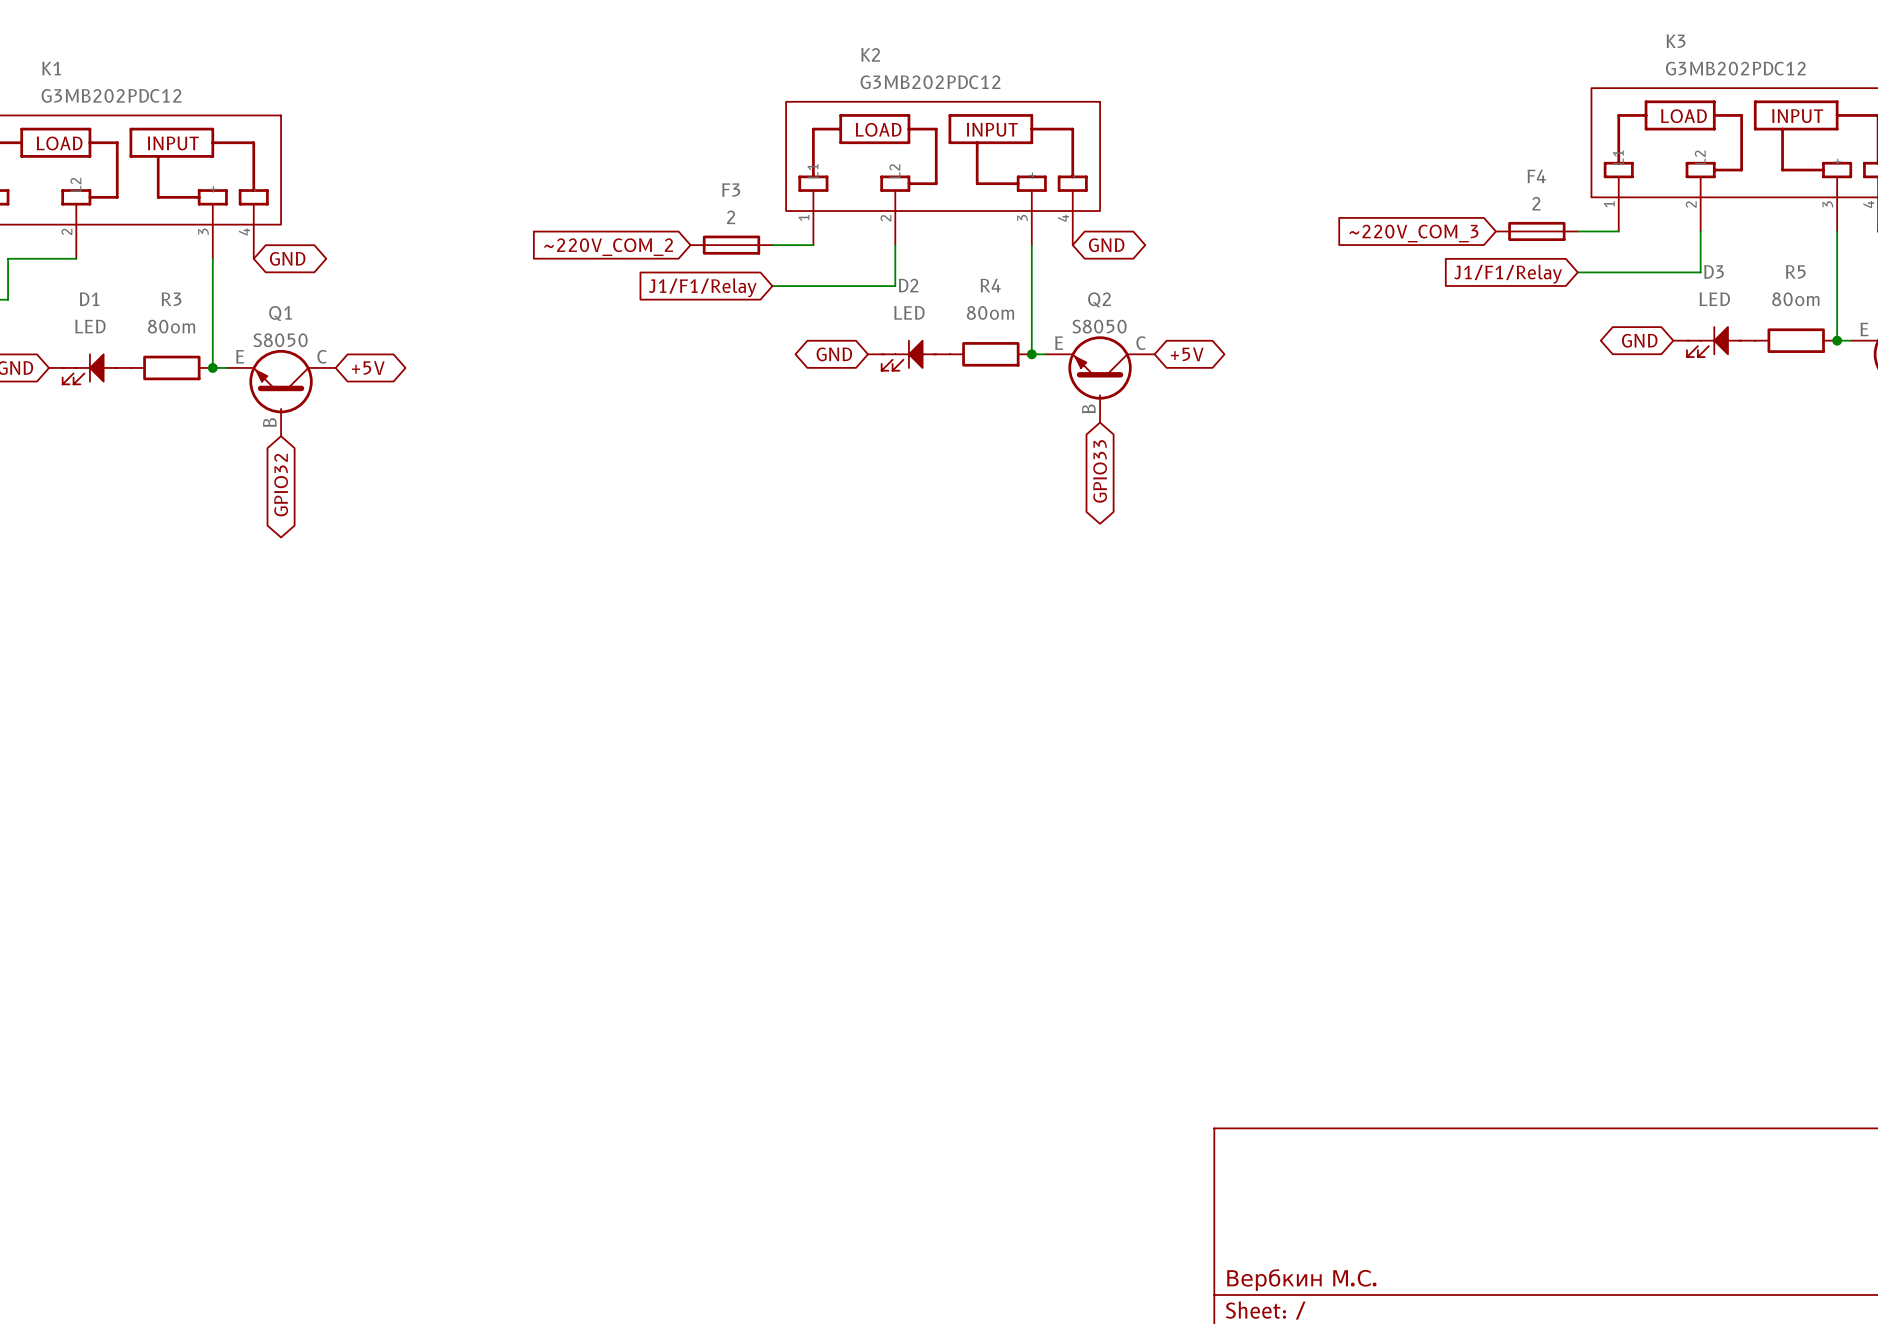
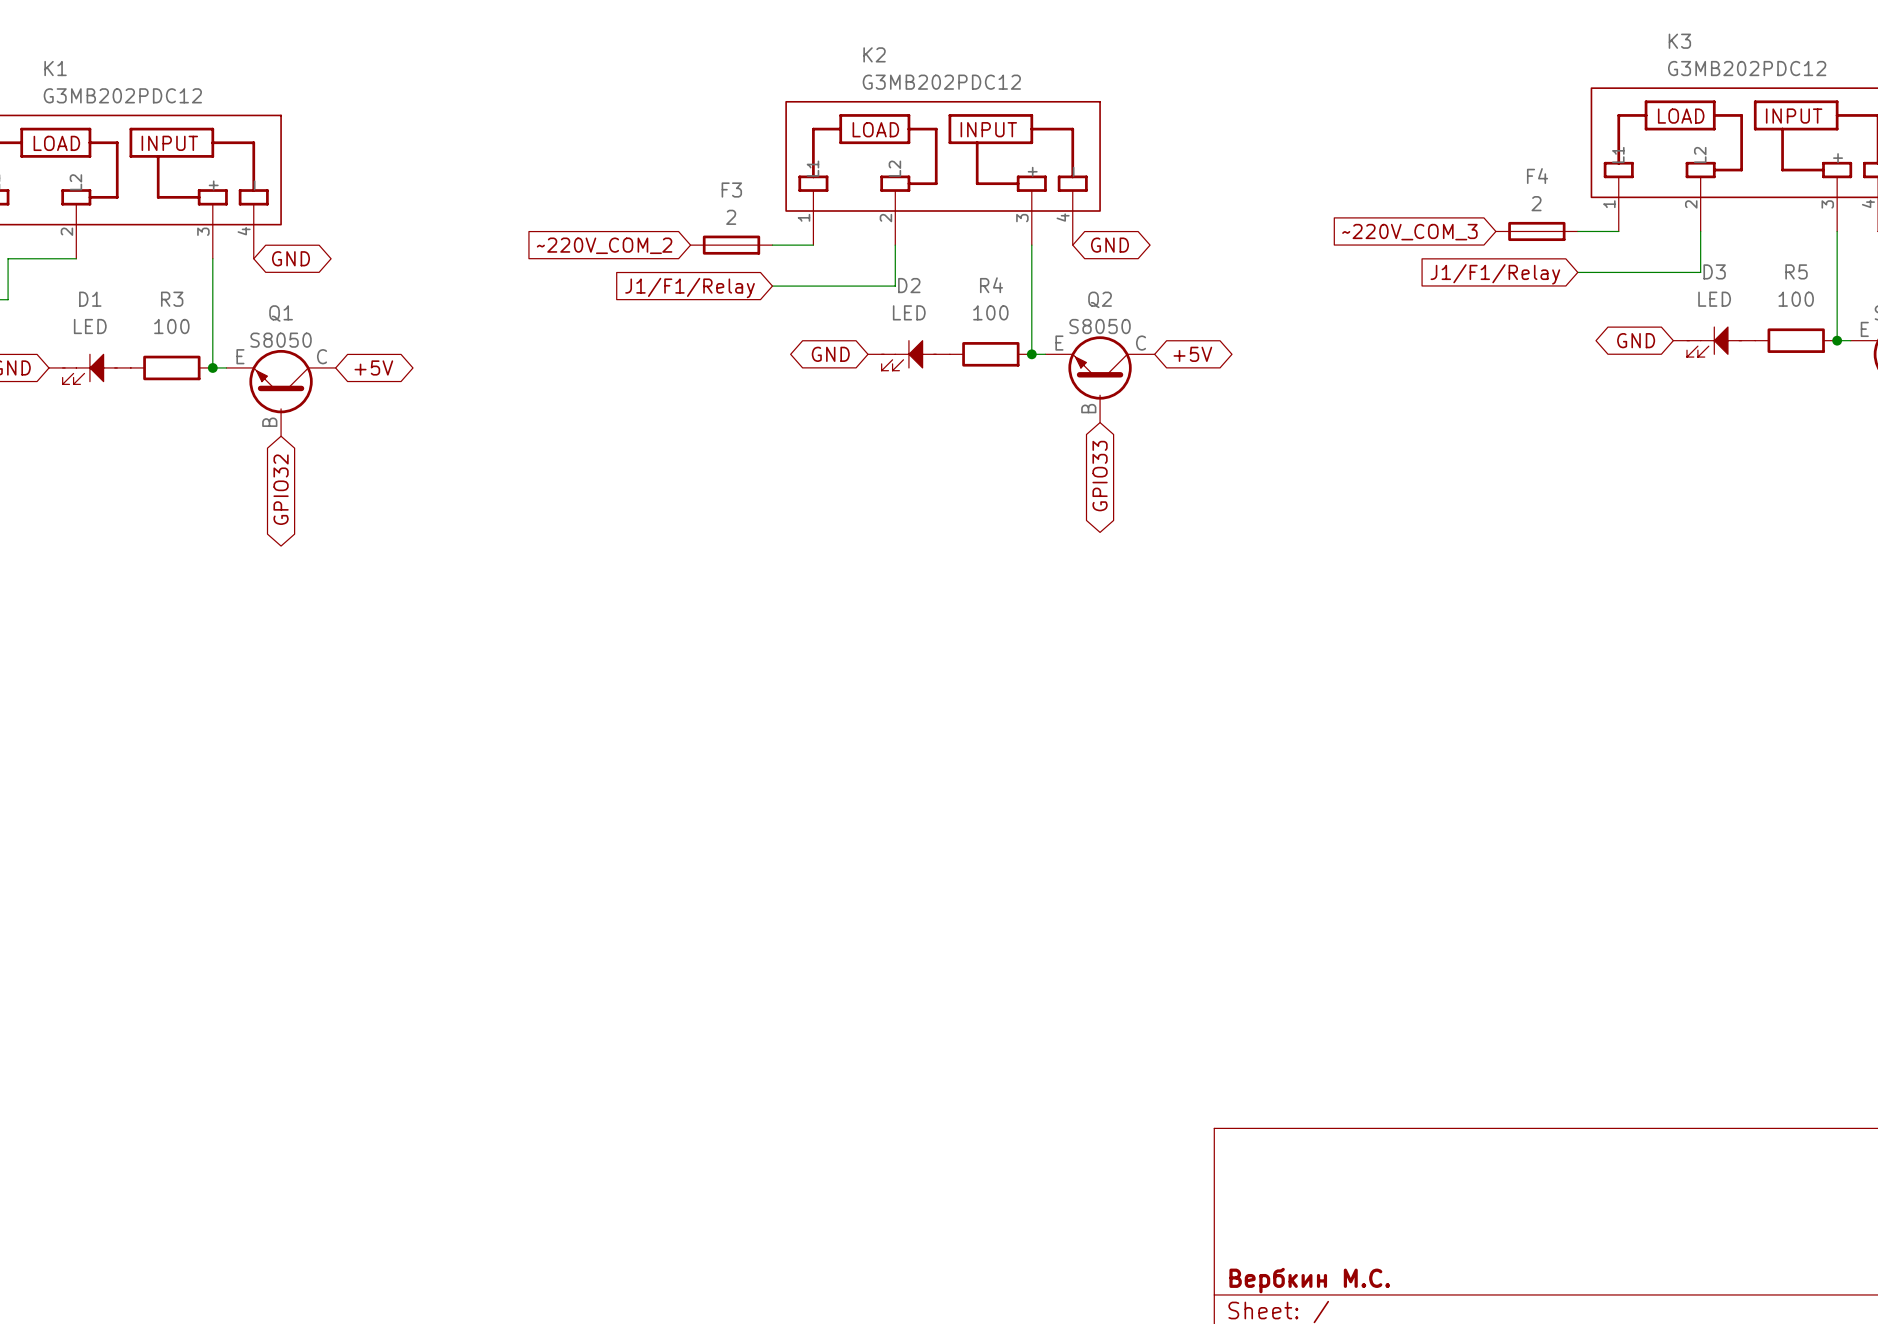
R5 value: 80om (1795, 299) -> 100 (1796, 299)
R4 value: 80om (990, 312) -> 100 (990, 312)
R3 value: 80om (171, 326) -> 100 (171, 326)

